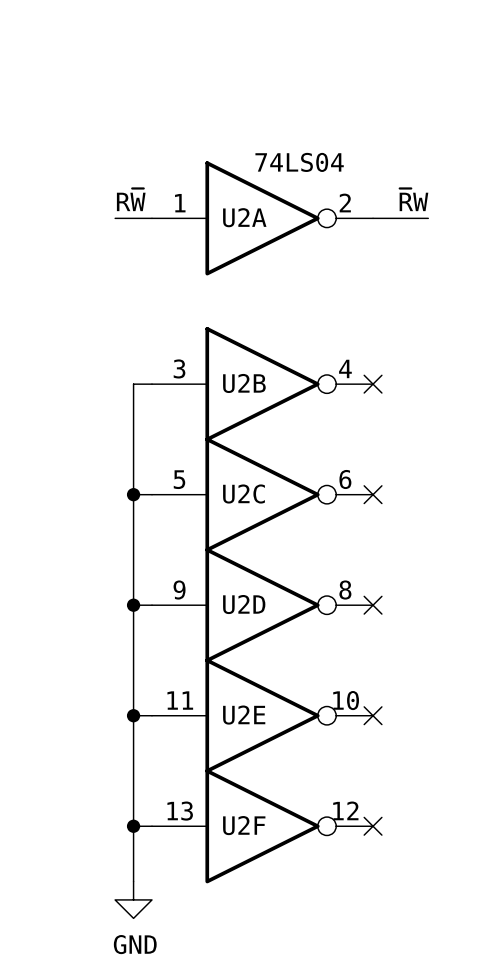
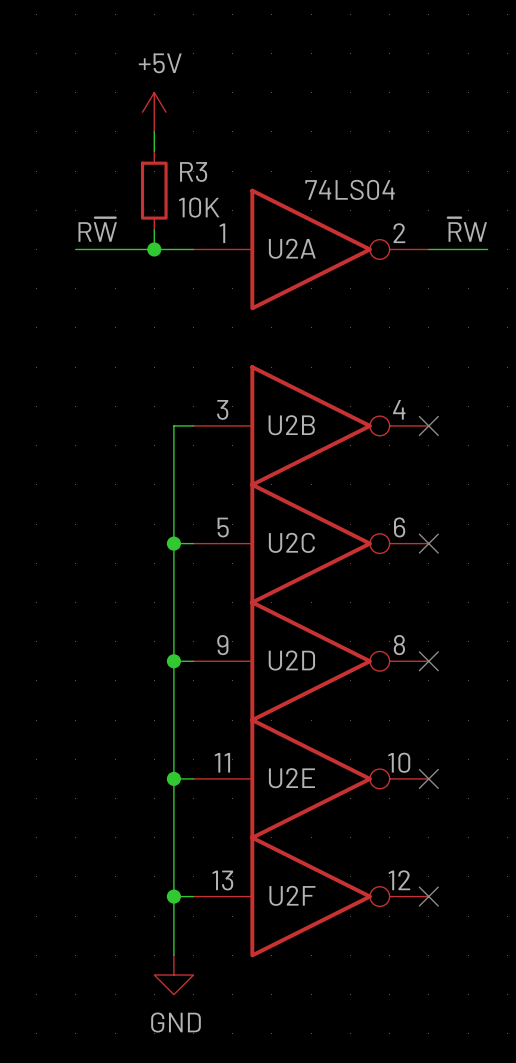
power symbol: none -> +5V (154, 112)
wire: none -> (154, 131) (154, 151)
R3: none -> 10K (154, 190)
wire: none -> (154, 229) (154, 249) (75, 249)
label position: R~{W} (131, 199) -> R~{W} (97, 229)
junction: none -> (154, 249)

